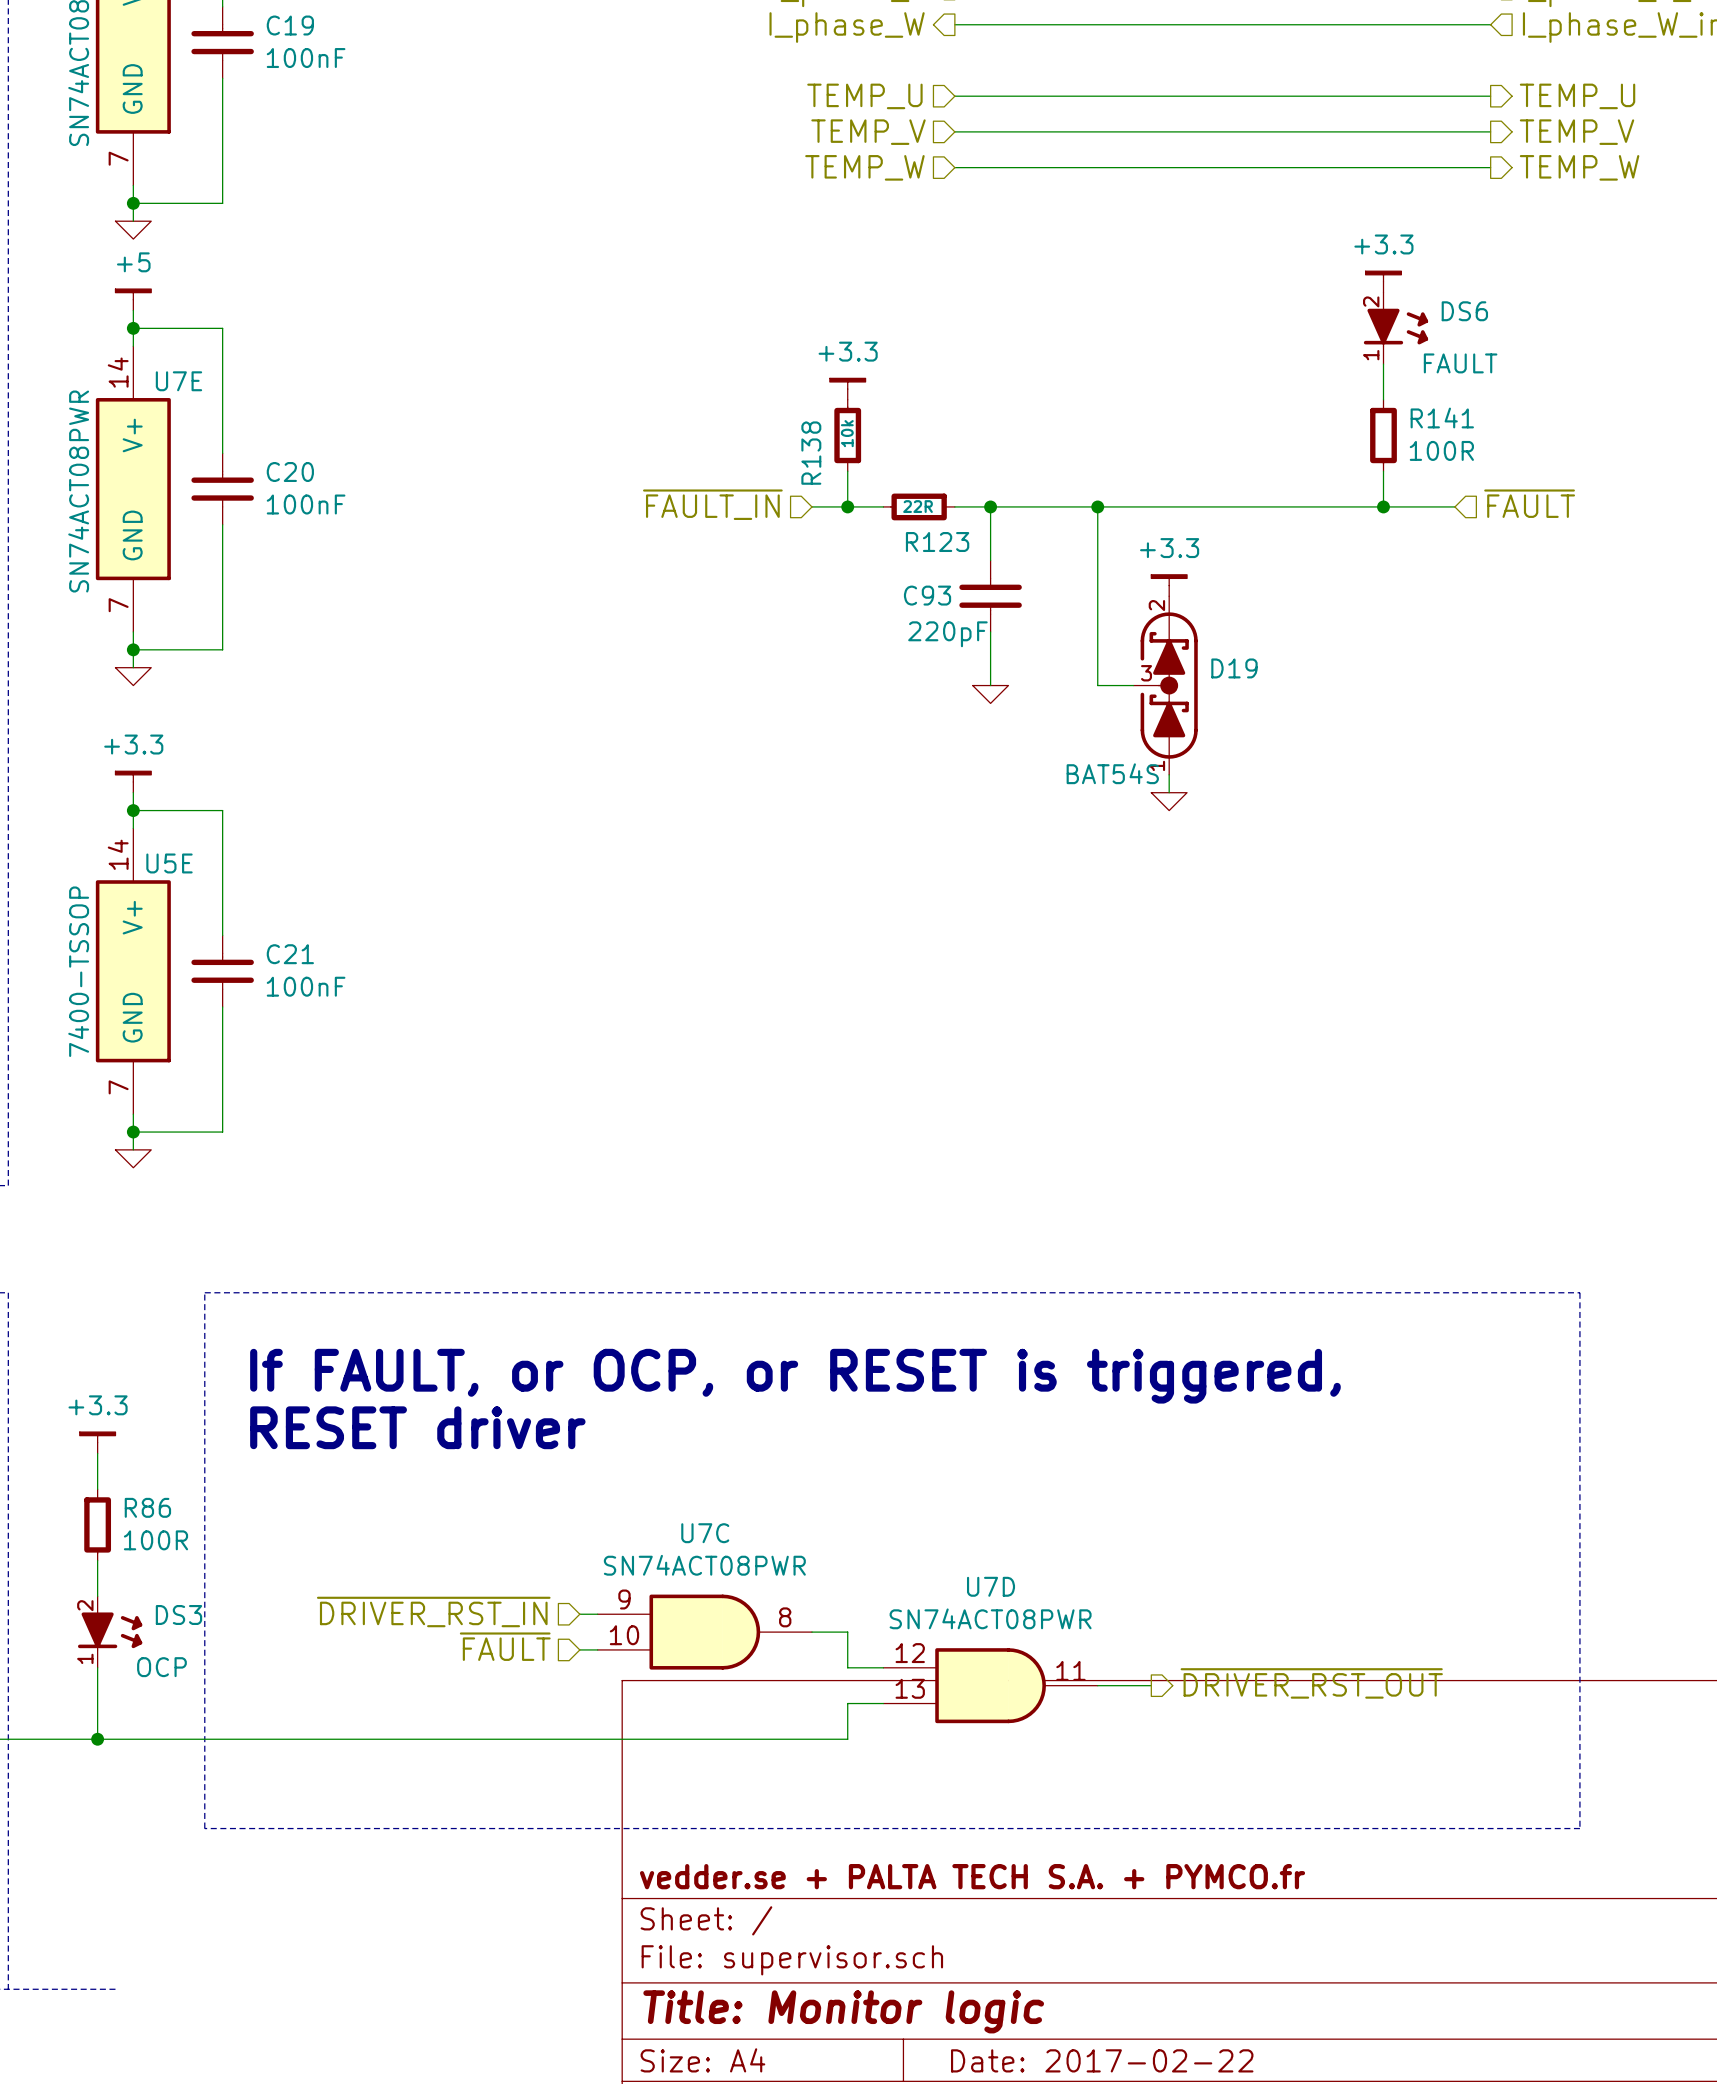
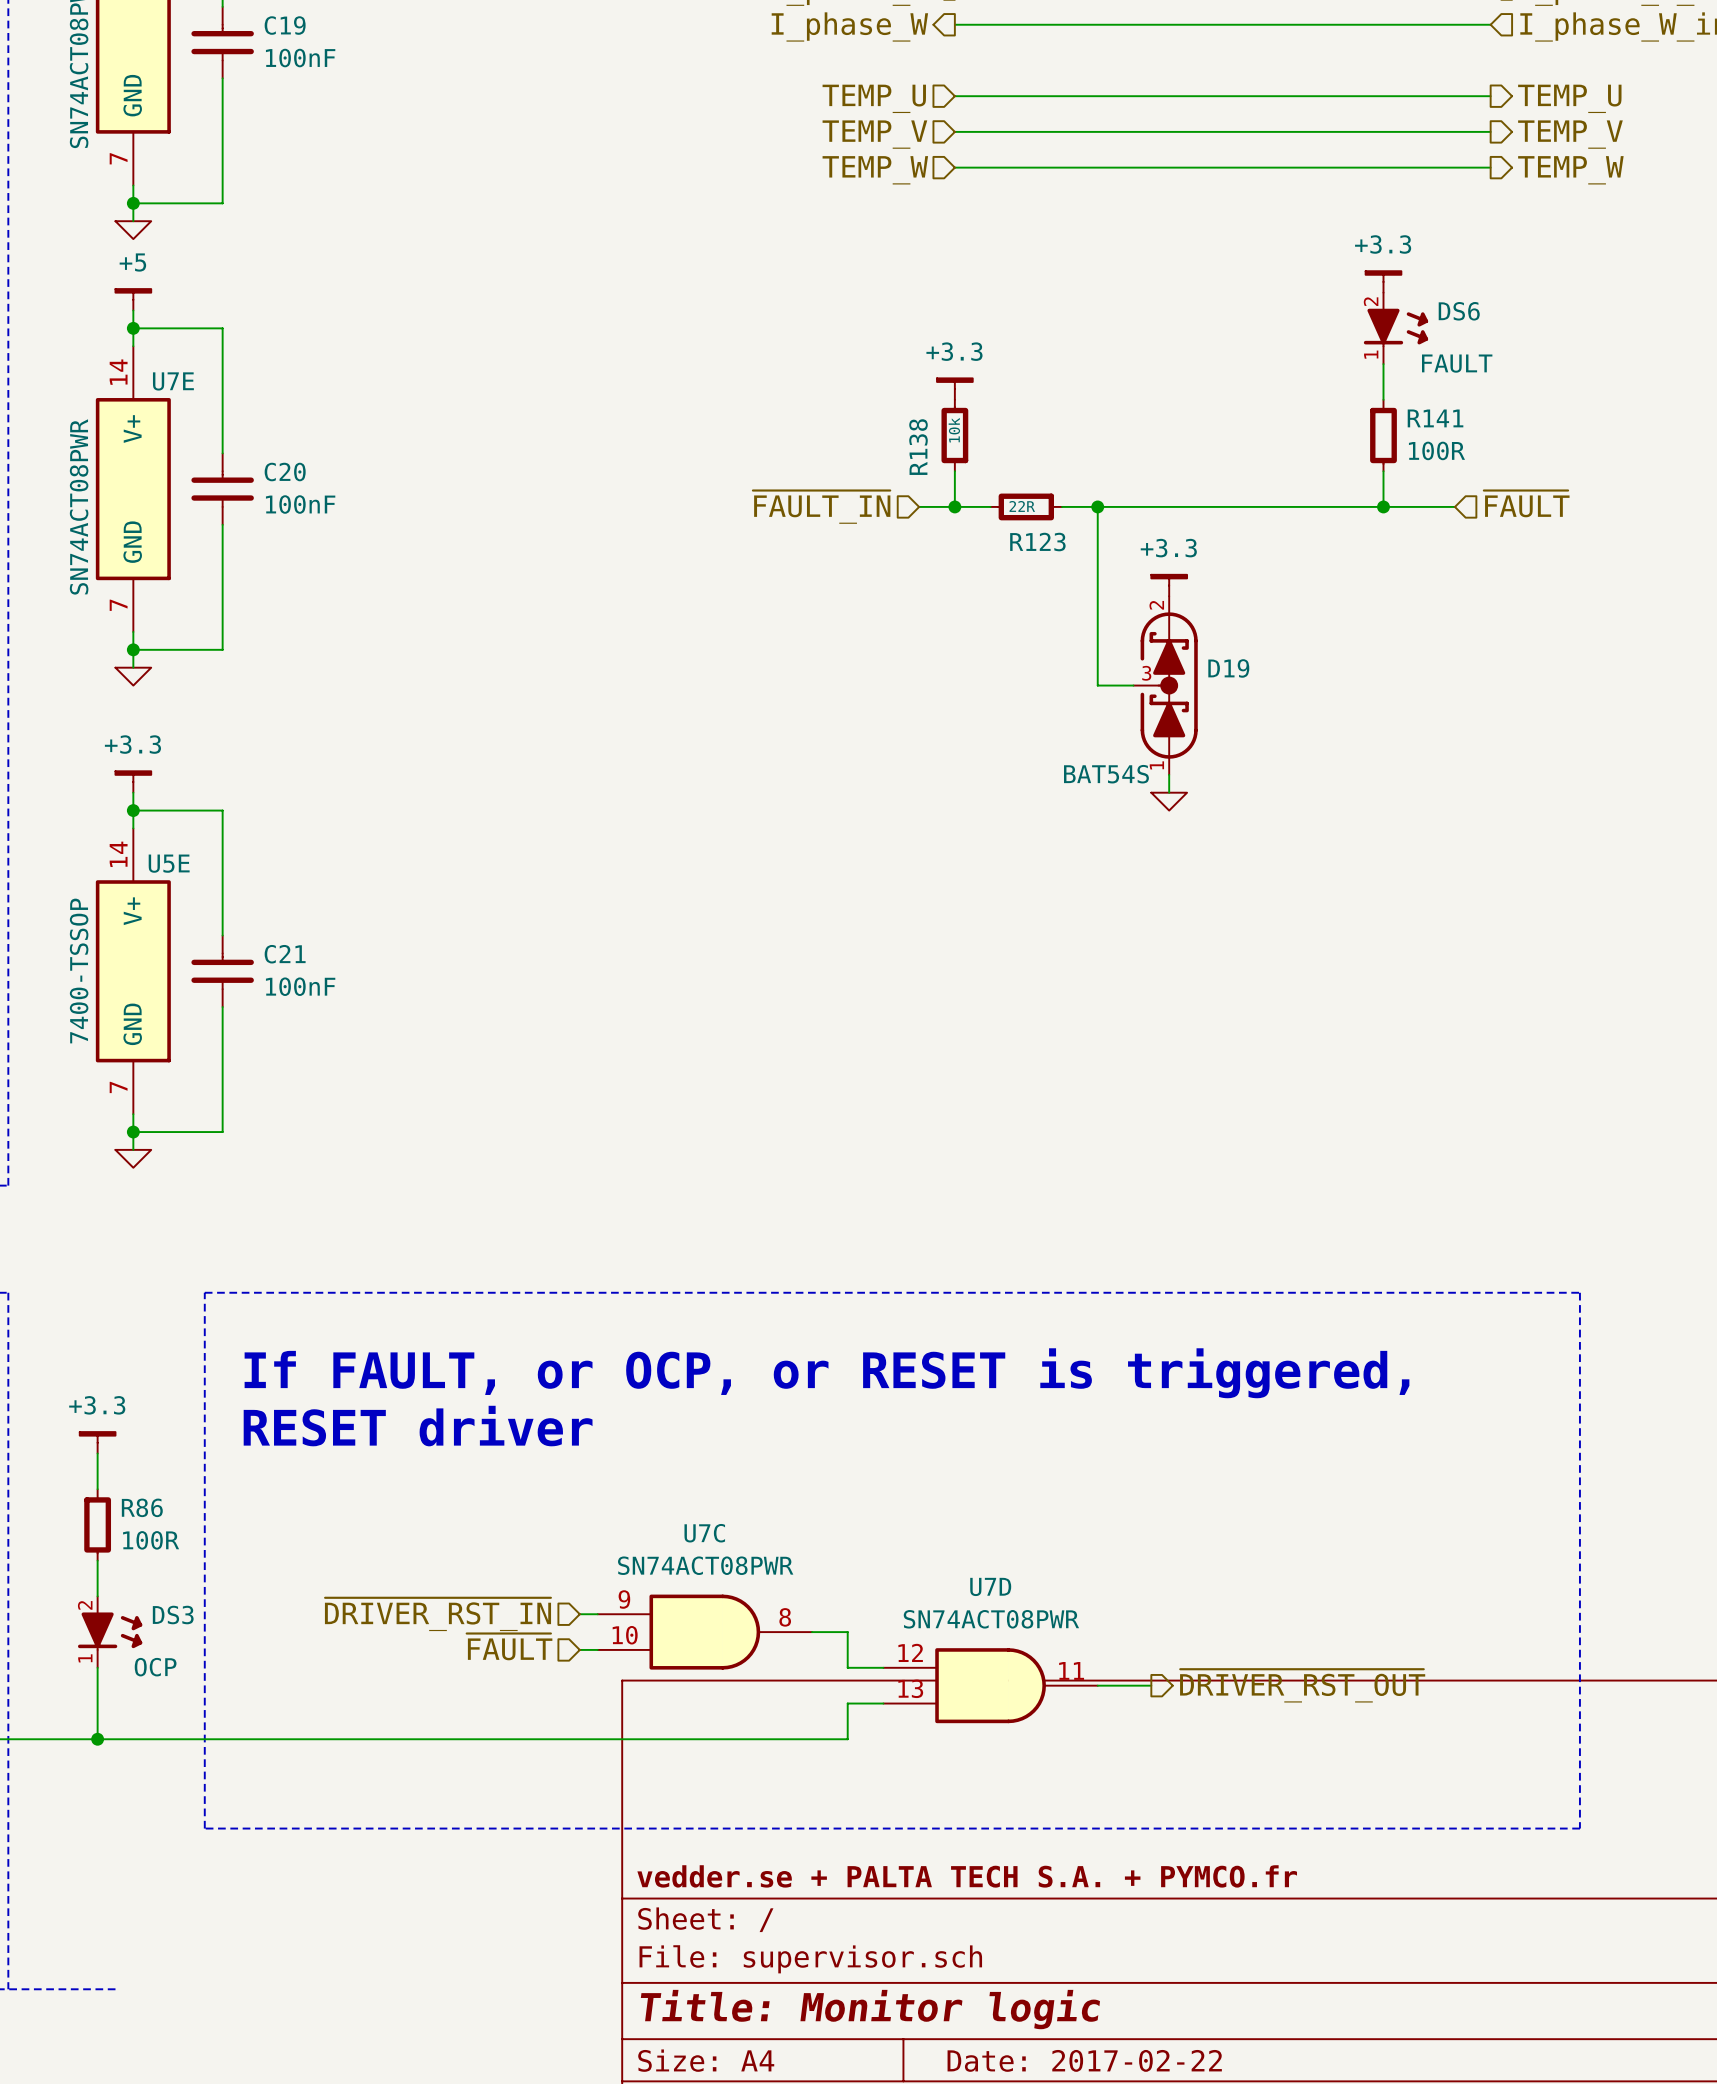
power symbol position: +3.3 (847, 389) -> +3.3 (954, 389)
R138 position: (847, 435) -> (954, 435)
wire: (847, 471) (847, 506) -> none
wire: none -> (954, 471) (954, 506) (919, 506)
hierarchical label position: ~{FAULT_IN} (712, 504) -> ~{FAULT_IN} (821, 507)
wire: (812, 506) (883, 506) -> none
junction: (847, 506) -> none
R123 position: (919, 506) -> (1026, 506)
junction position: (990, 506) -> (954, 506)
wire: (1062, 506) (990, 506) (990, 560) -> none
C93: 220pF (990, 596) -> none
wire: (990, 631) (990, 685) -> none
power symbol: (990, 694) -> none

